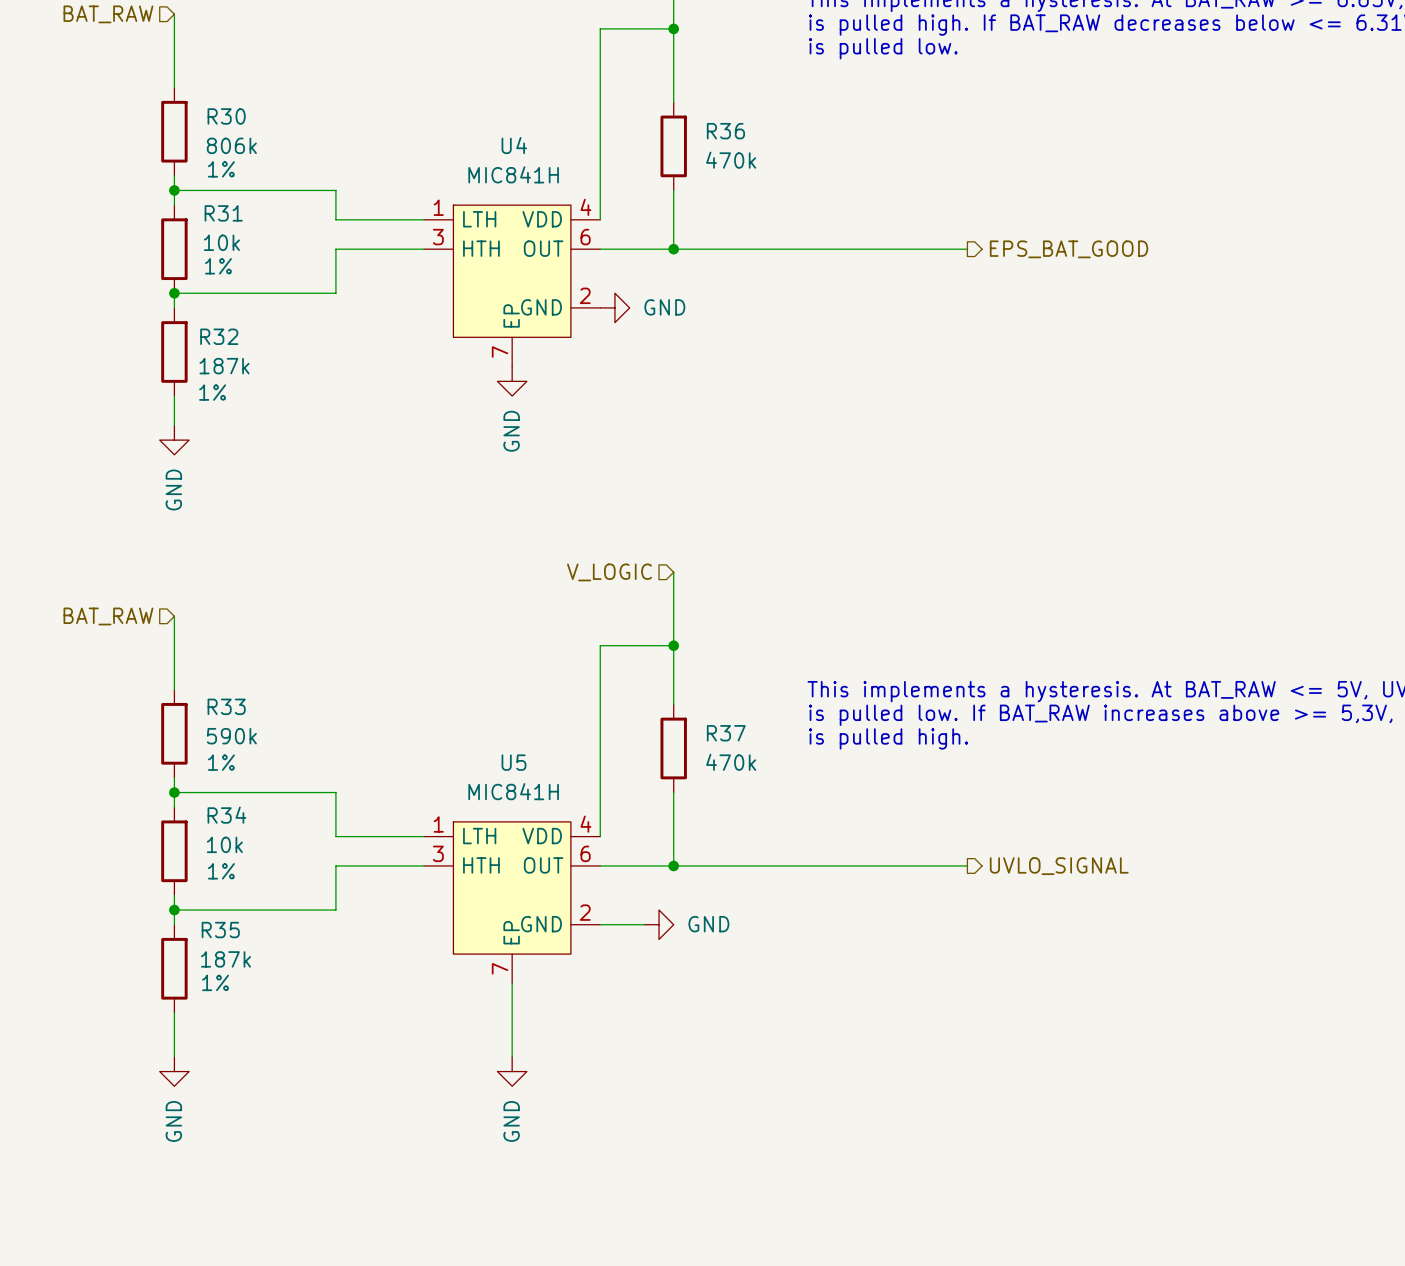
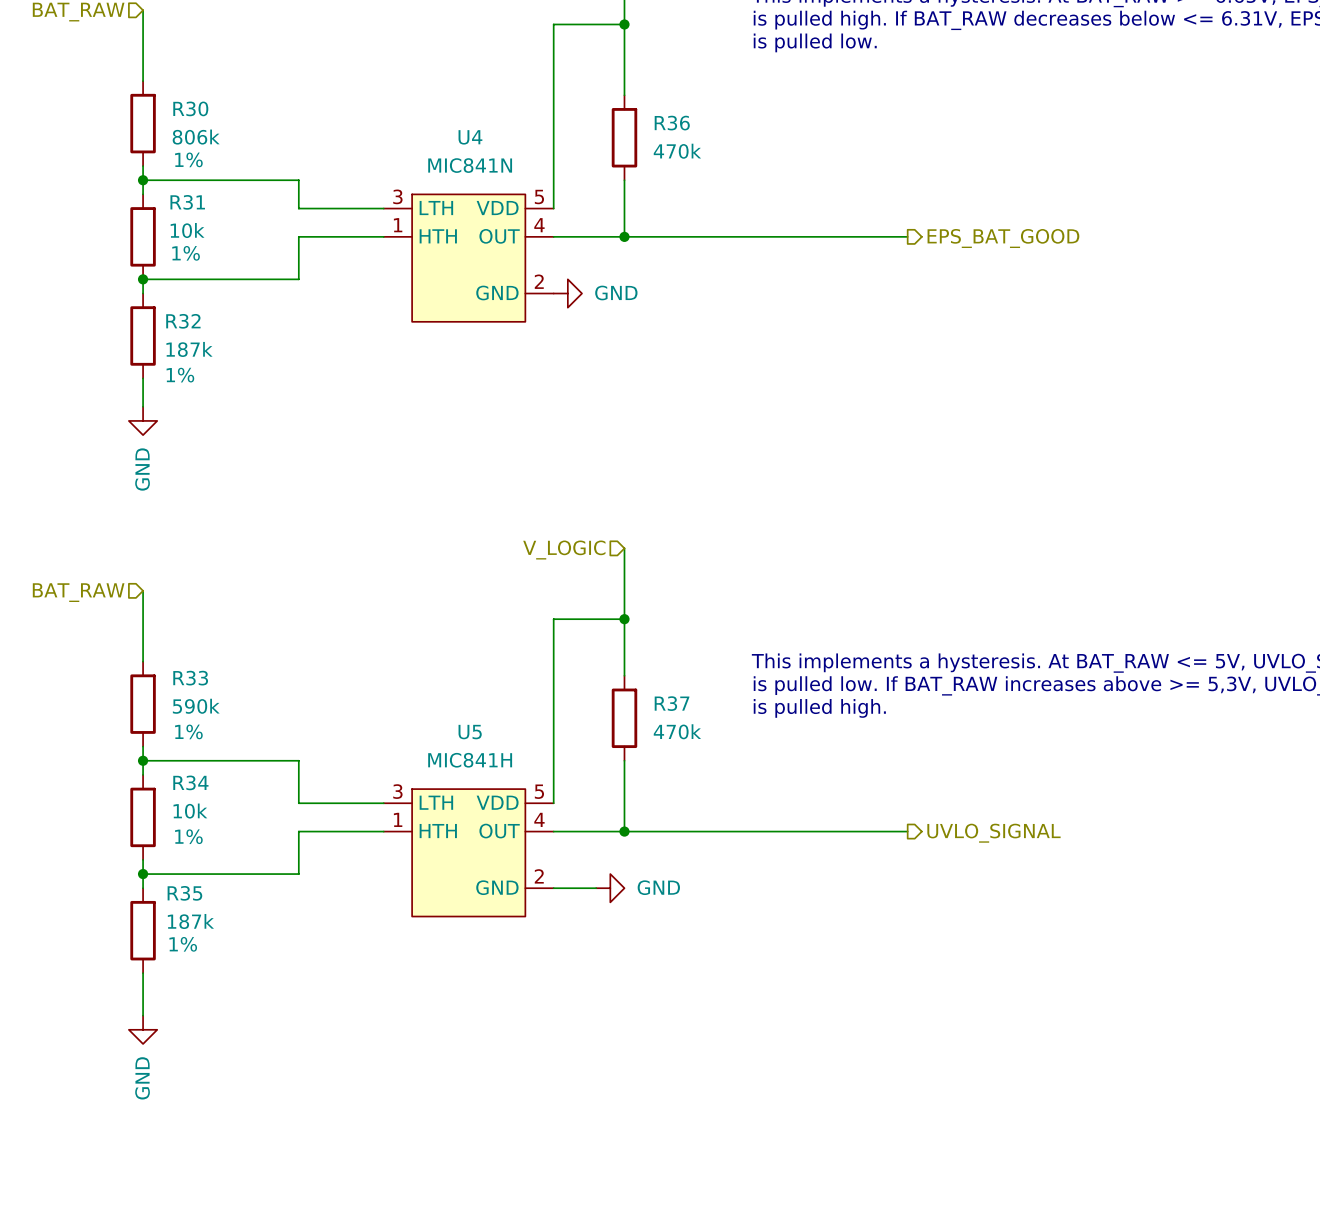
U4 value: MIC841H (513, 174) -> MIC841N (470, 165)
U4 symbol: [424, 205, 601, 367] -> [383, 194, 554, 322]
power symbol: GND (512, 381) -> none
U5 symbol: [424, 821, 601, 984] -> [383, 789, 554, 917]
wire: (512, 983) (512, 1056) -> none
power symbol: GND (512, 1071) -> none

